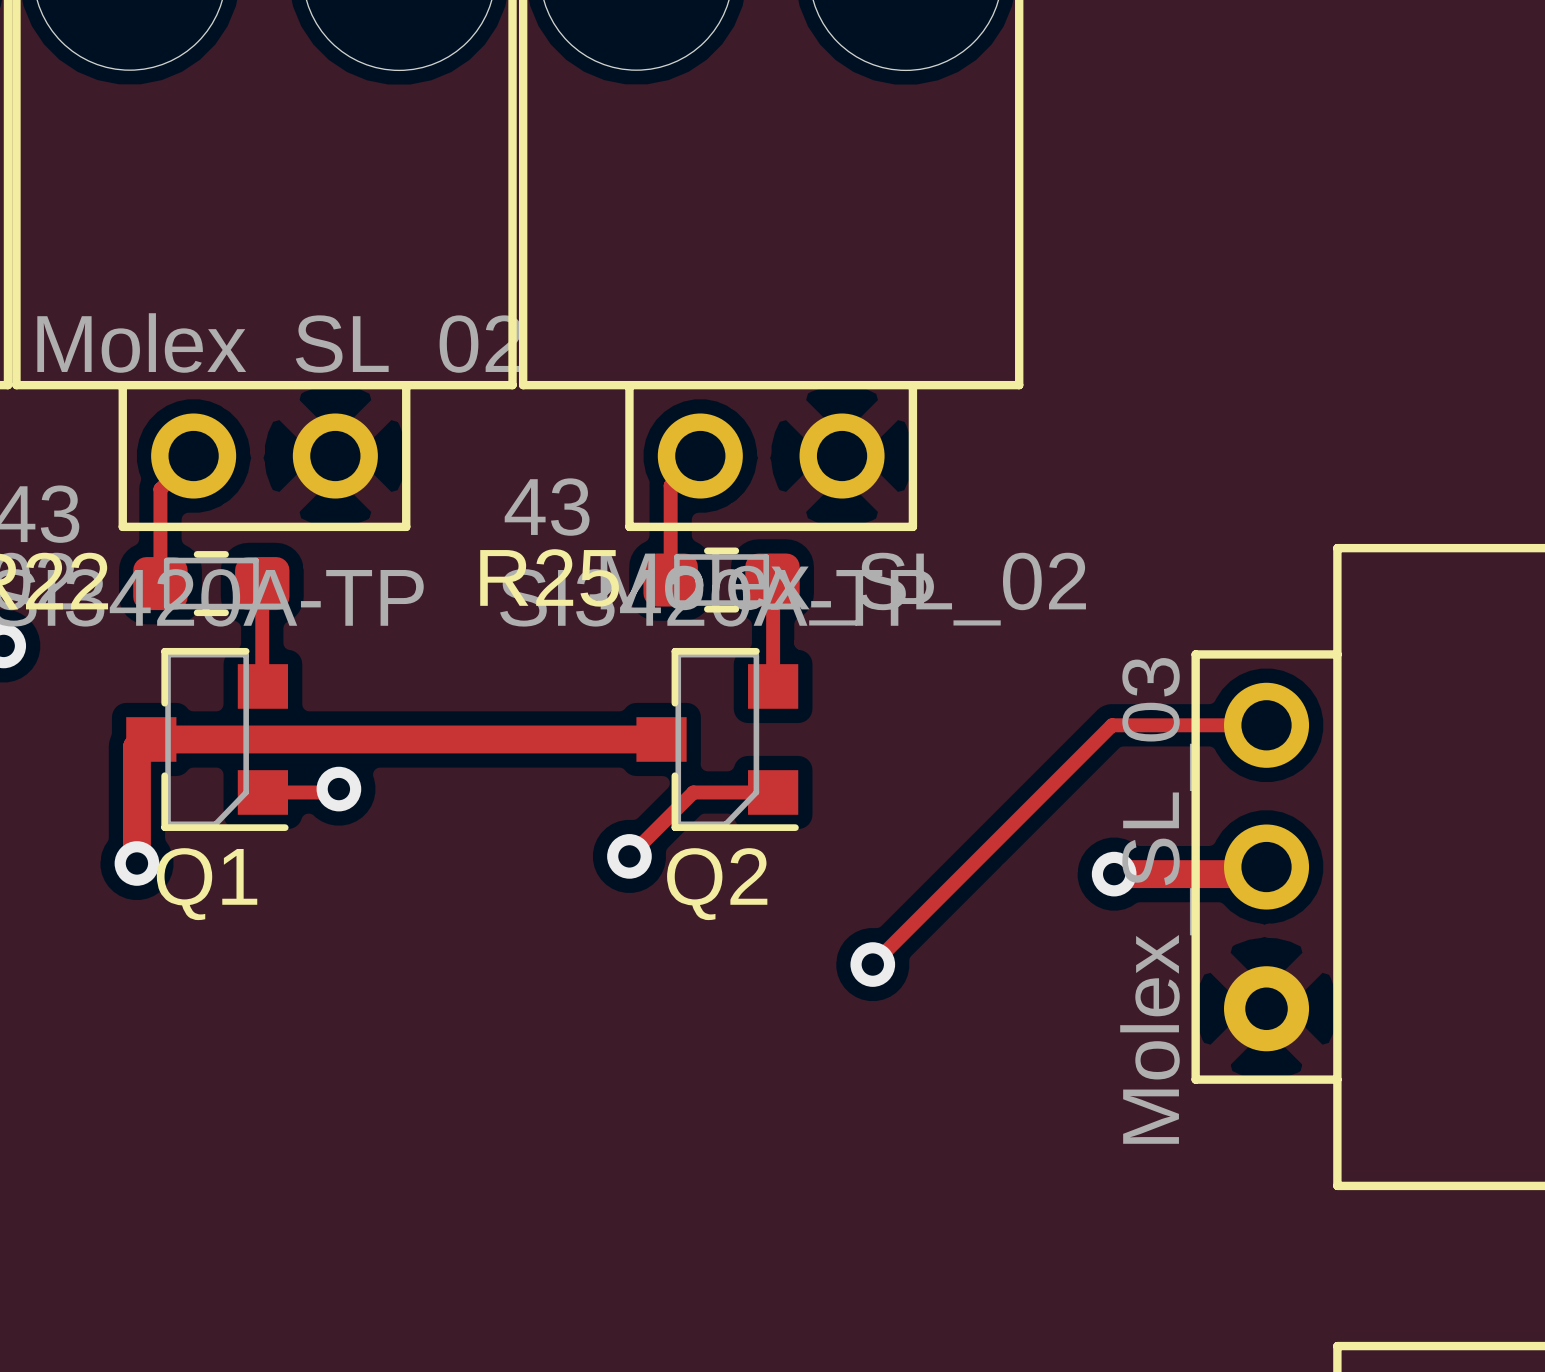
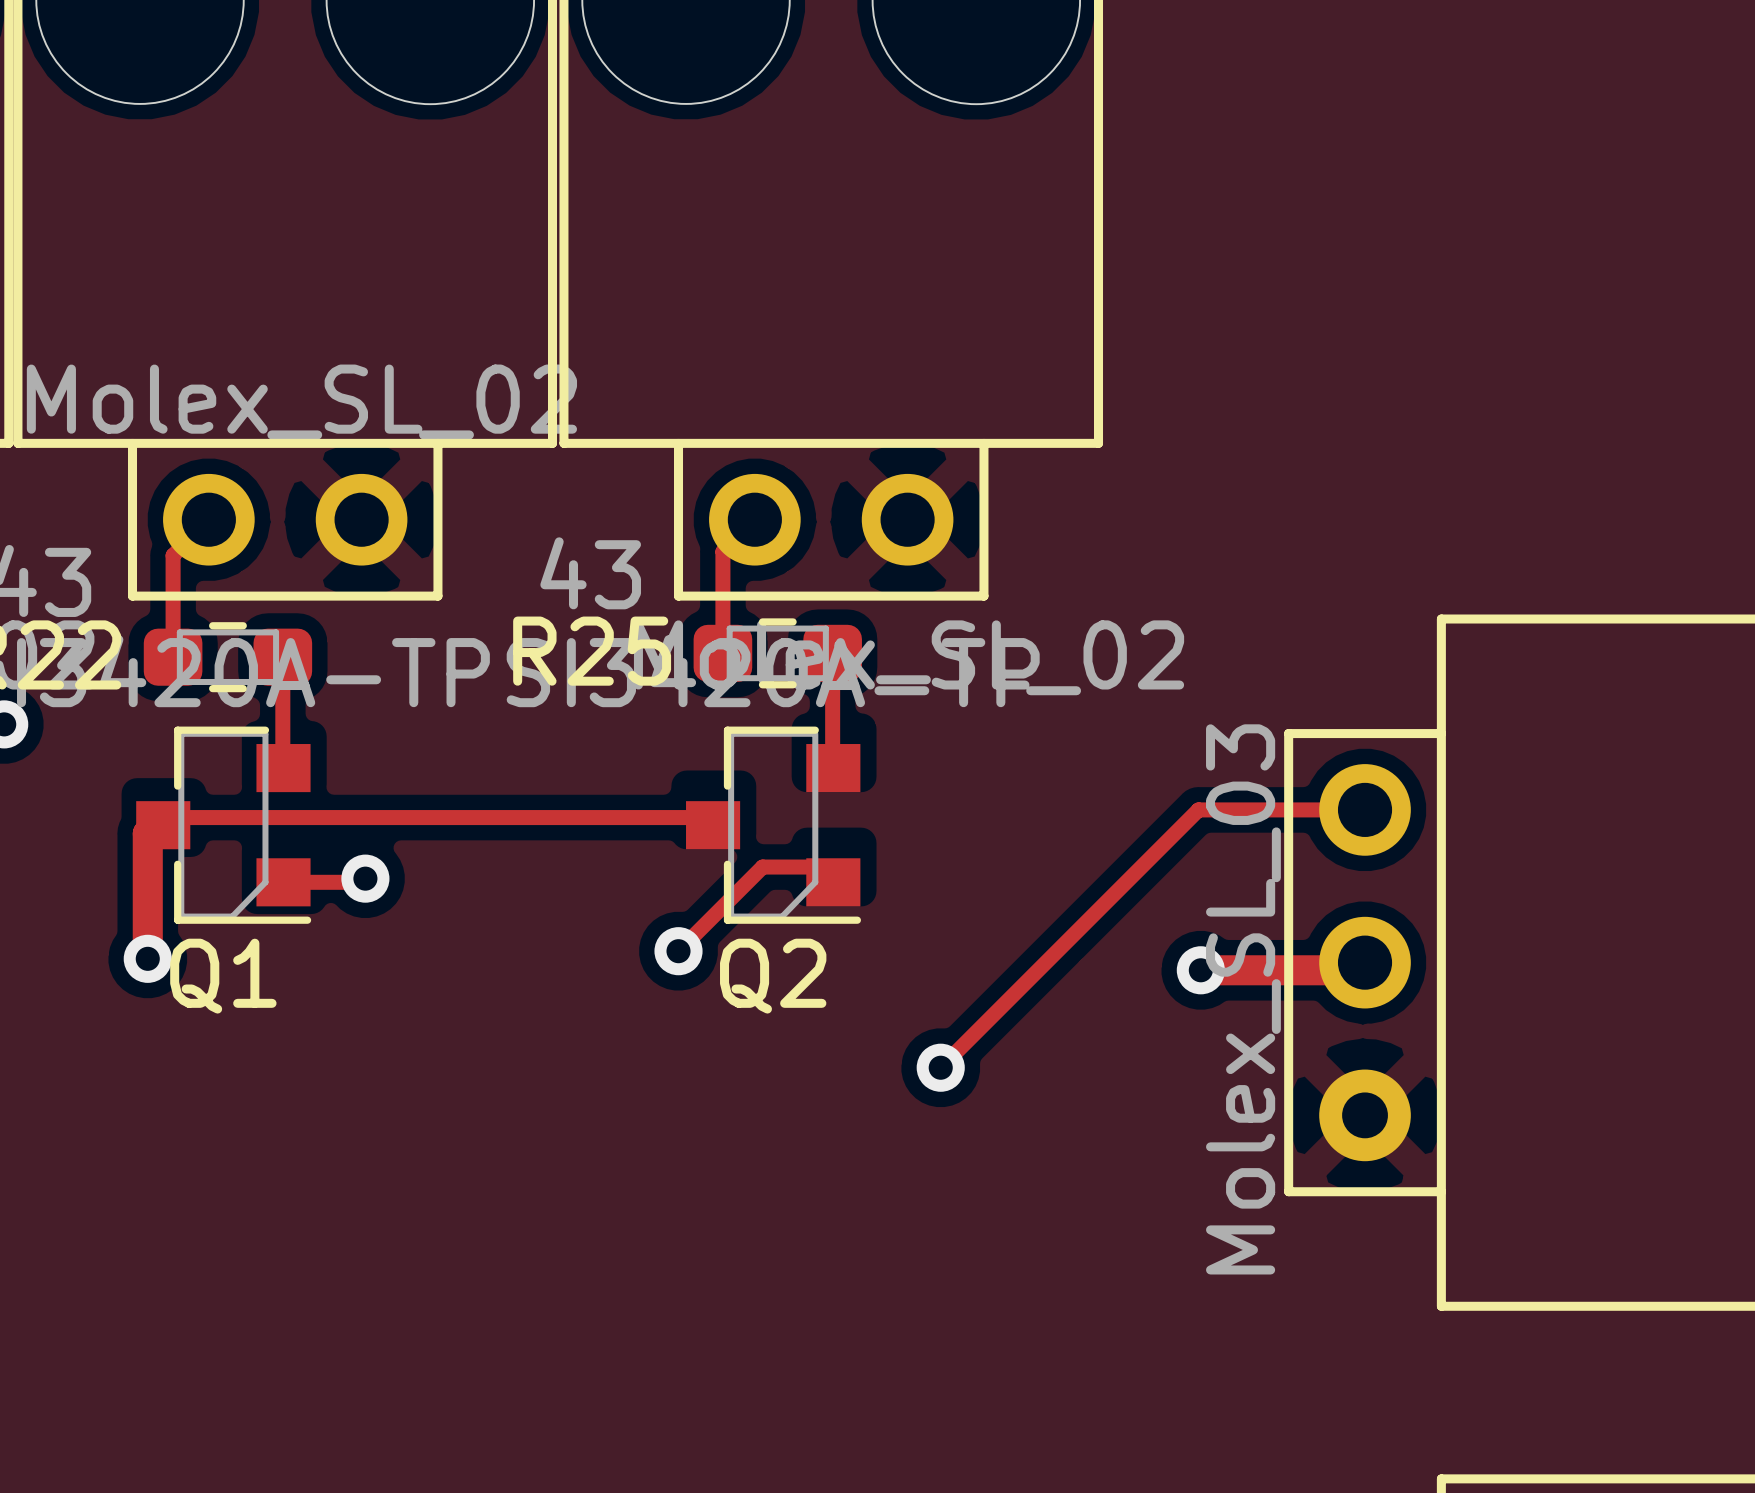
track: (773, 580) (773, 686) -> (832, 653) (832, 751)
track: (144, 739) (661, 739) -> (156, 825) (164, 817) (706, 817) (713, 809)
track: (693, 792) (773, 792) -> (747, 882) (762, 867) (834, 867)

